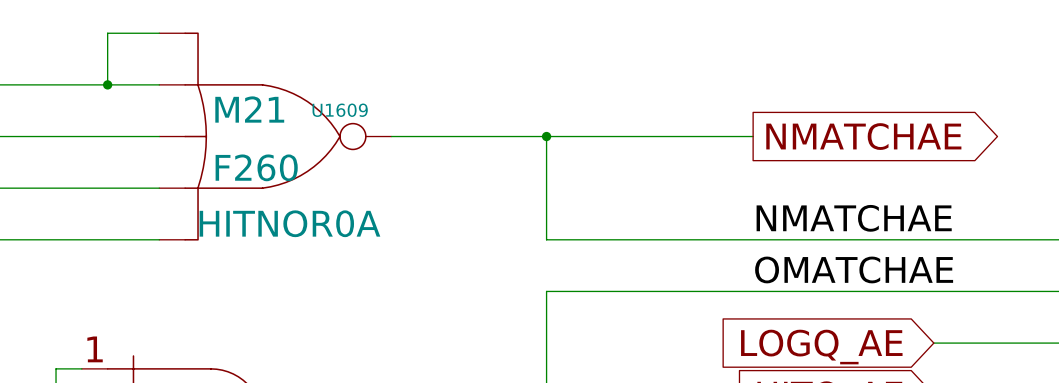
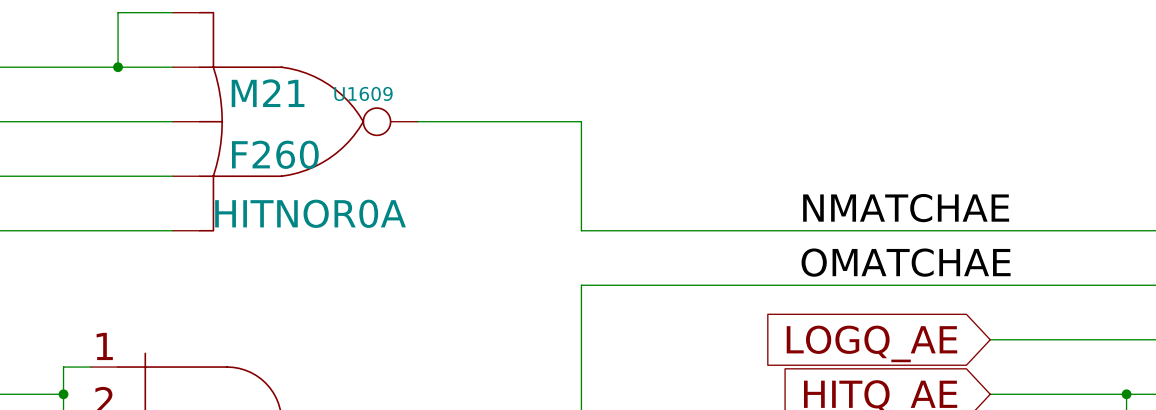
wire: (546, 136) (753, 136) -> none
junction: (546, 136) -> none
global label: NMATCHAE (863, 136) -> none

